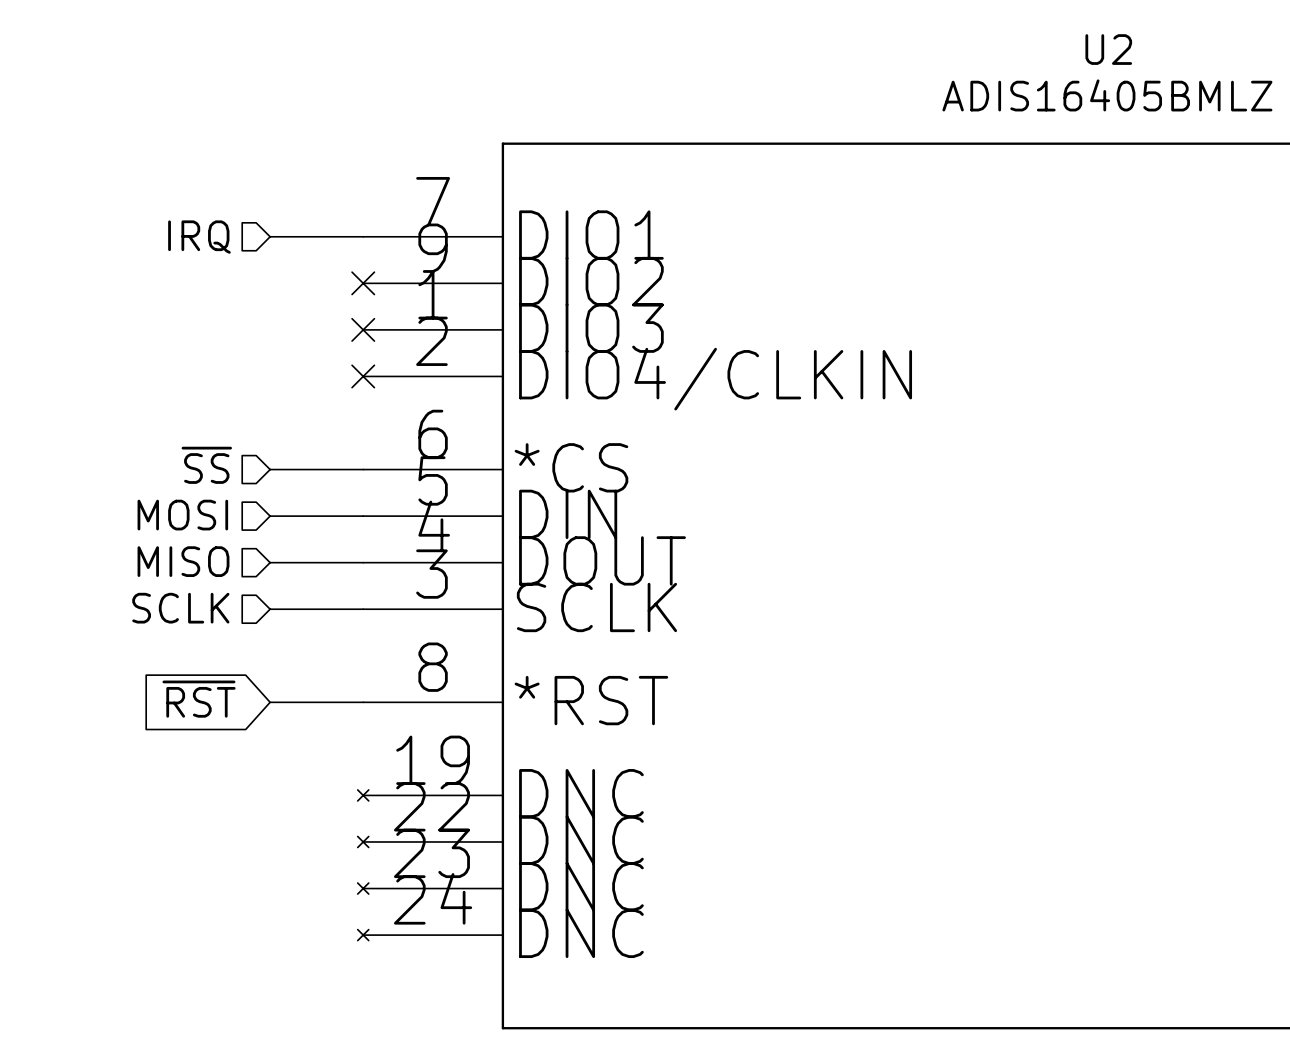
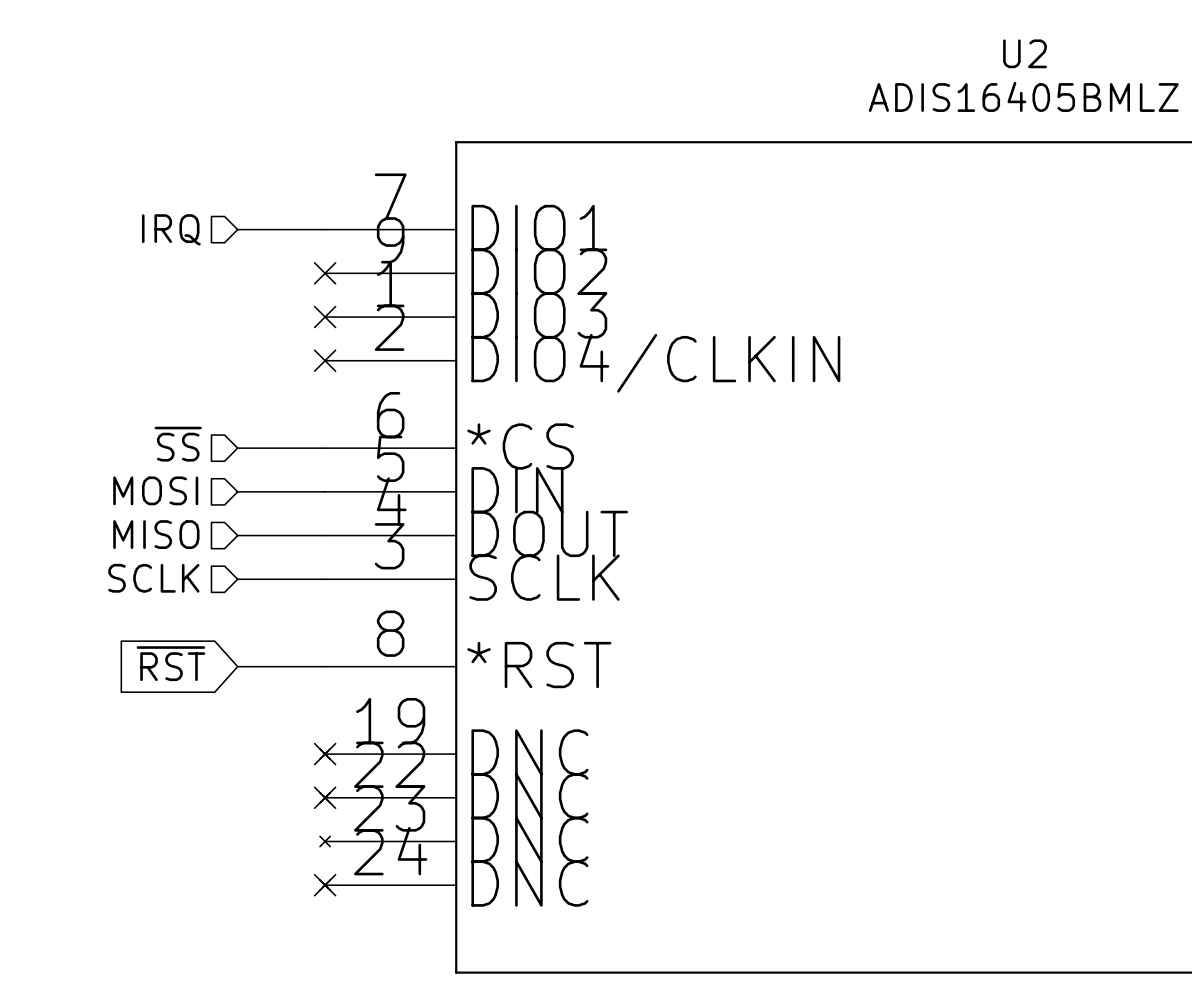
no-connect mark: none -> (325, 754)
no-connect mark: none -> (325, 797)
no-connect mark: none -> (325, 885)

